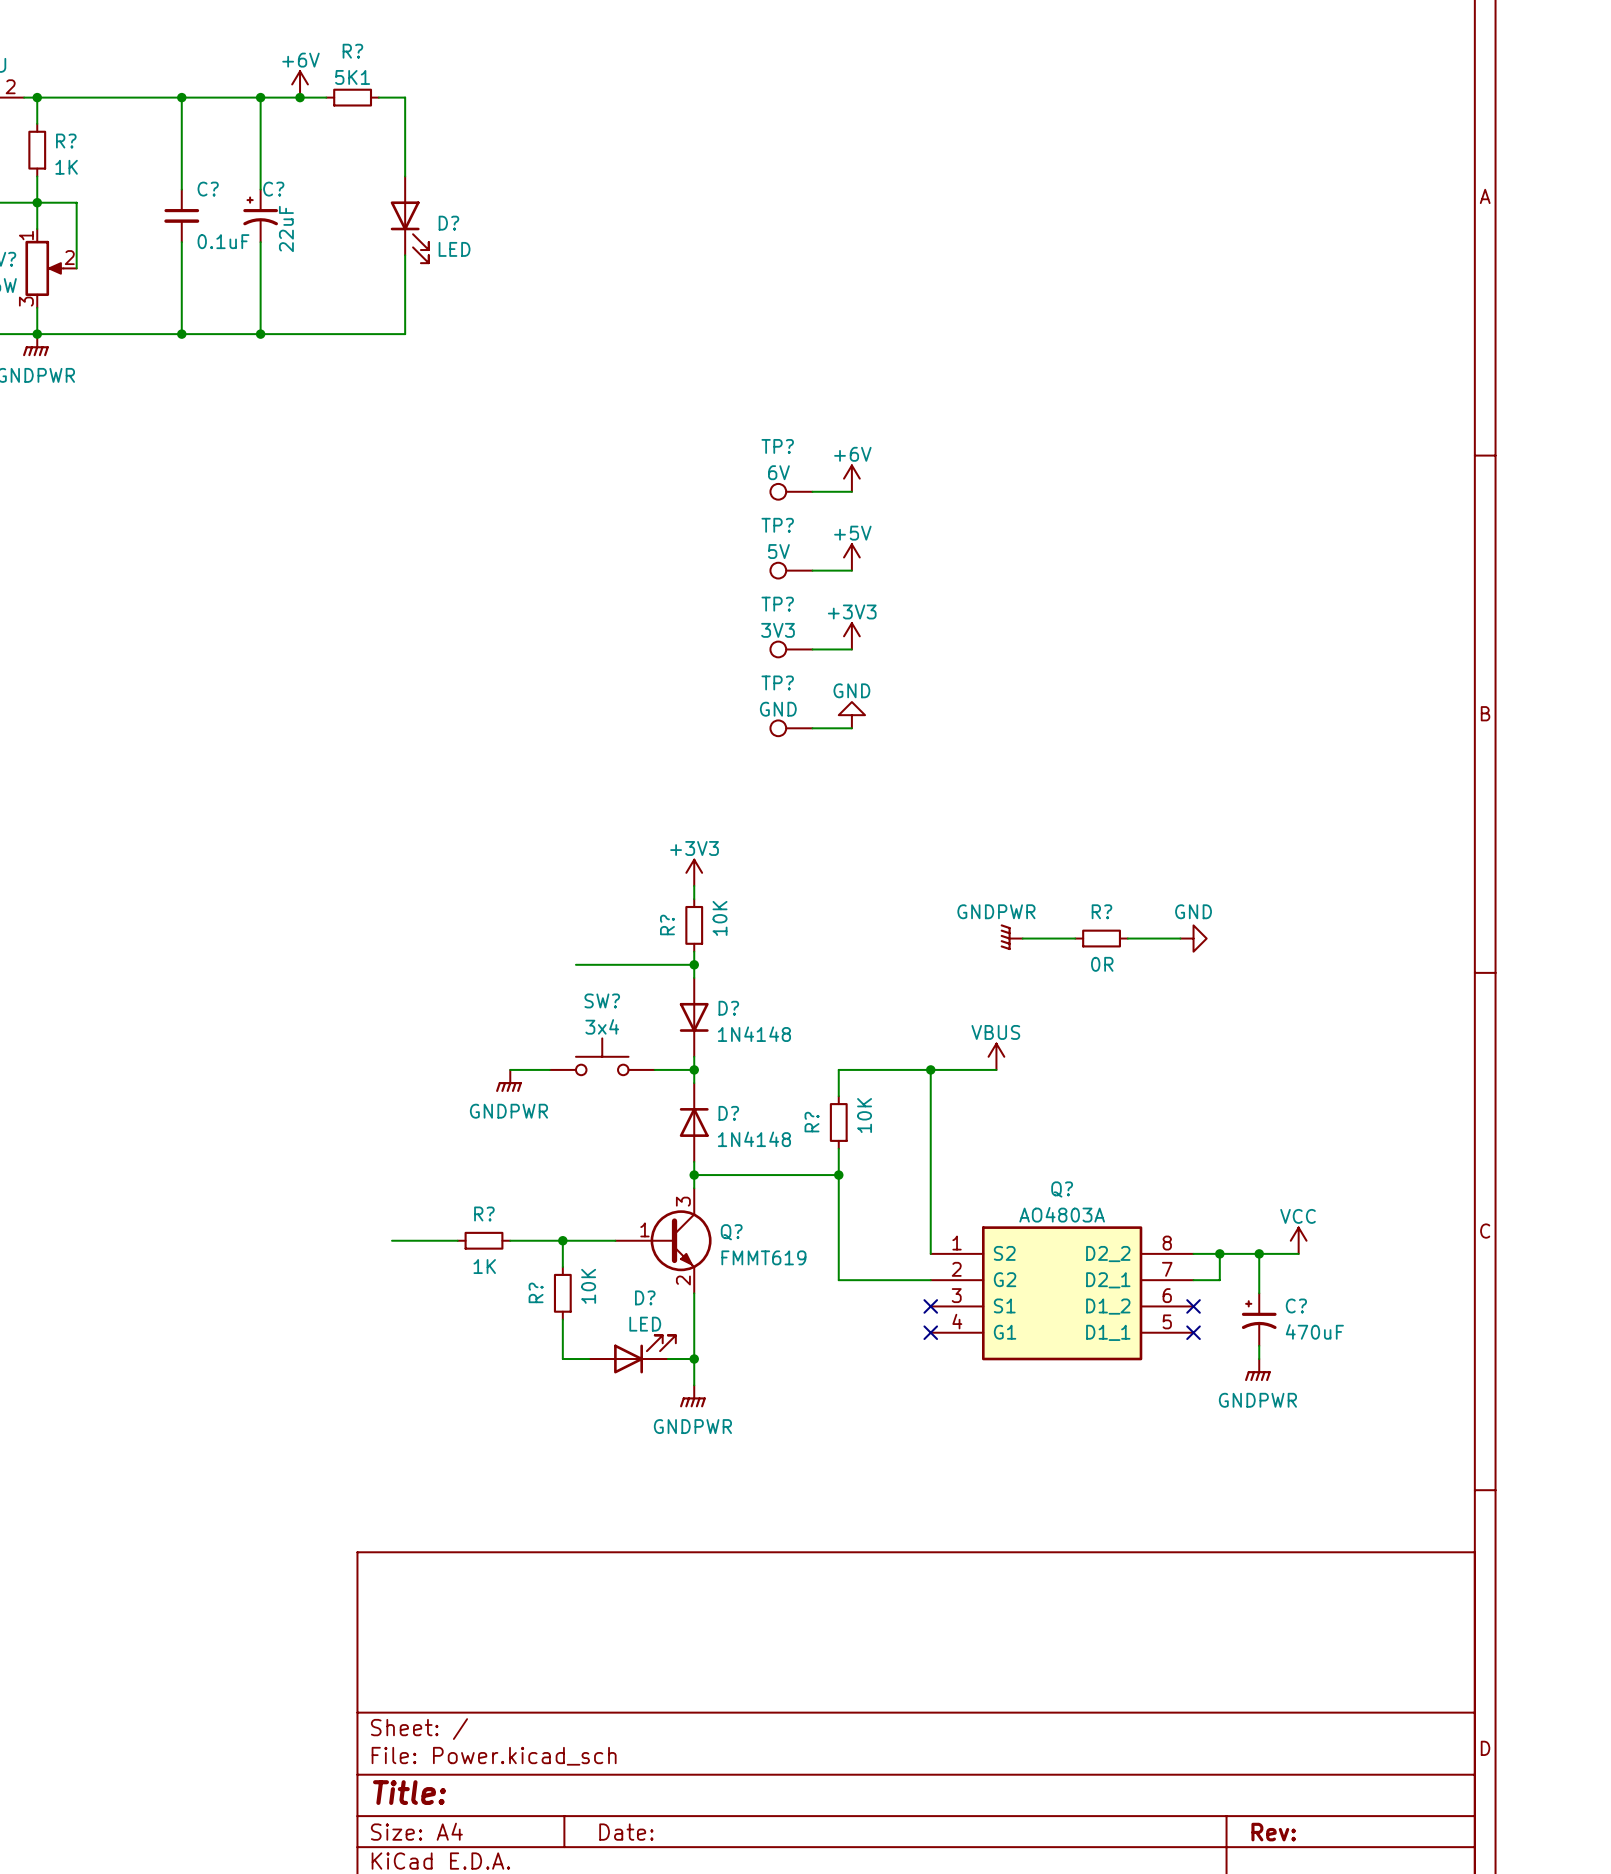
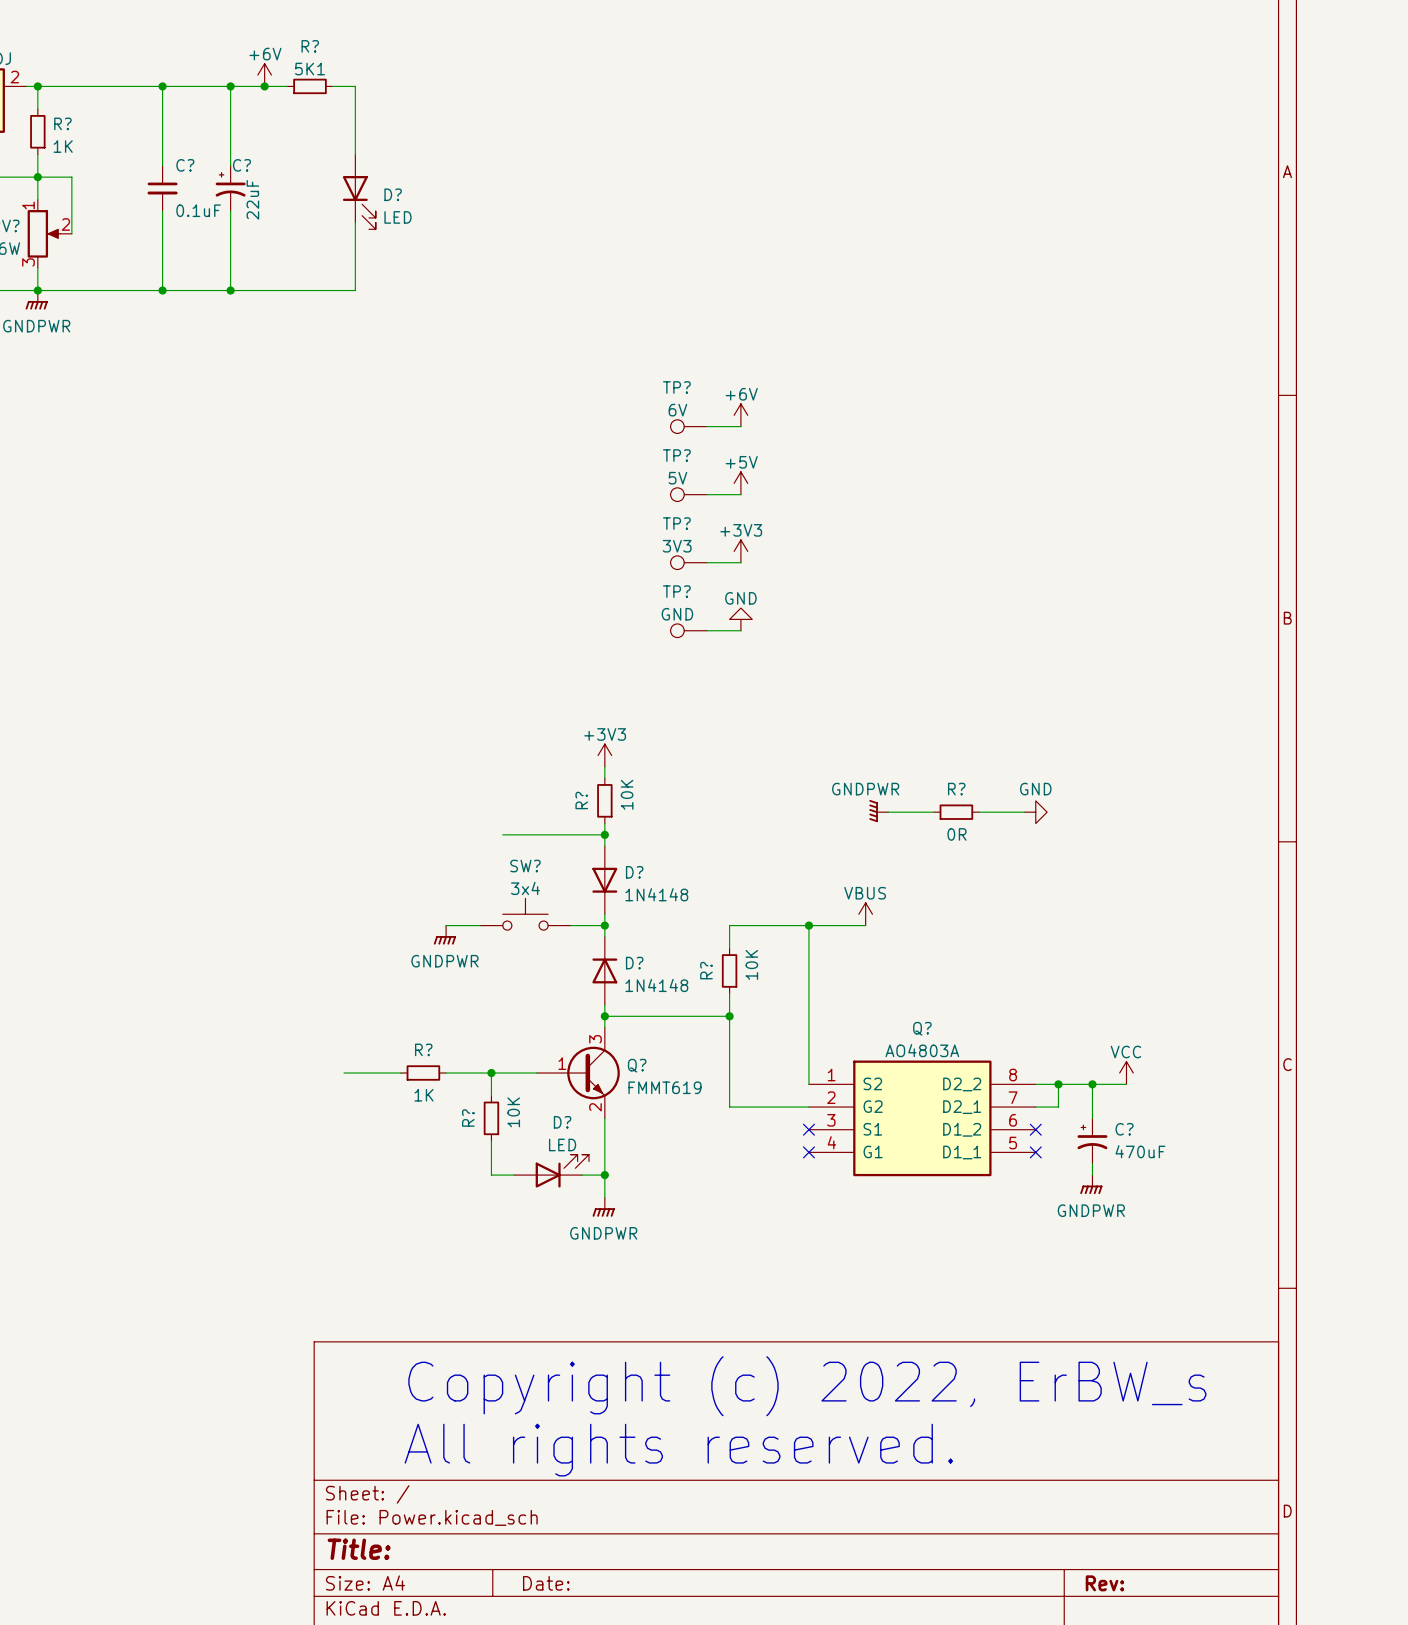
text: none -> Copyright (c) 2022, ErBW_s (807, 1386)
text: none -> All rights reserved. (678, 1450)

